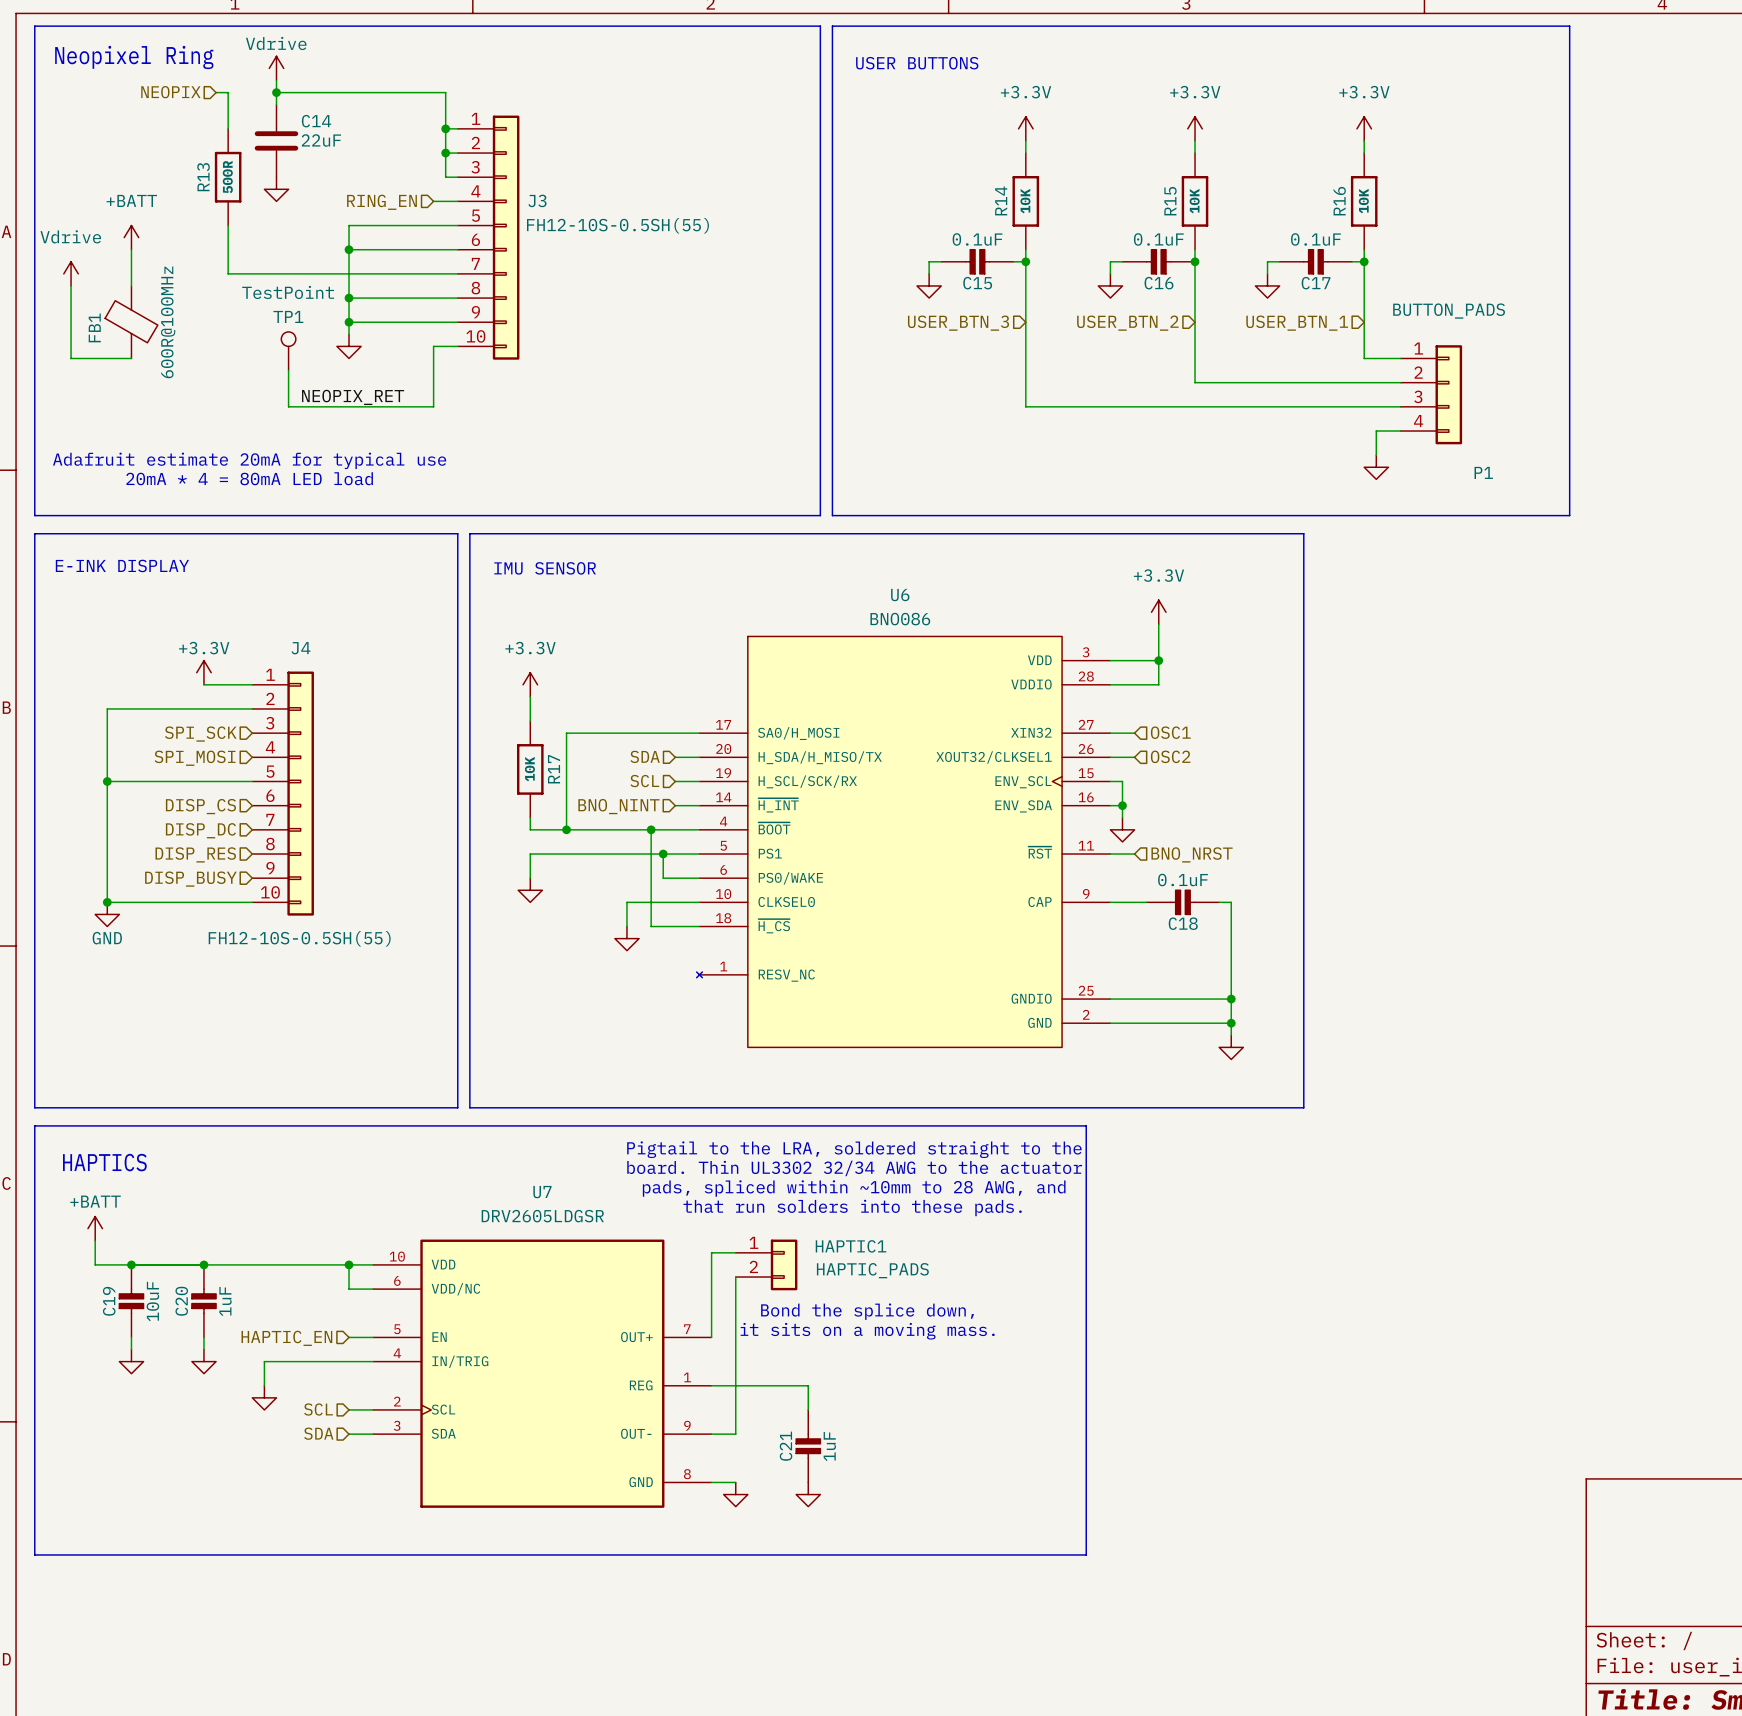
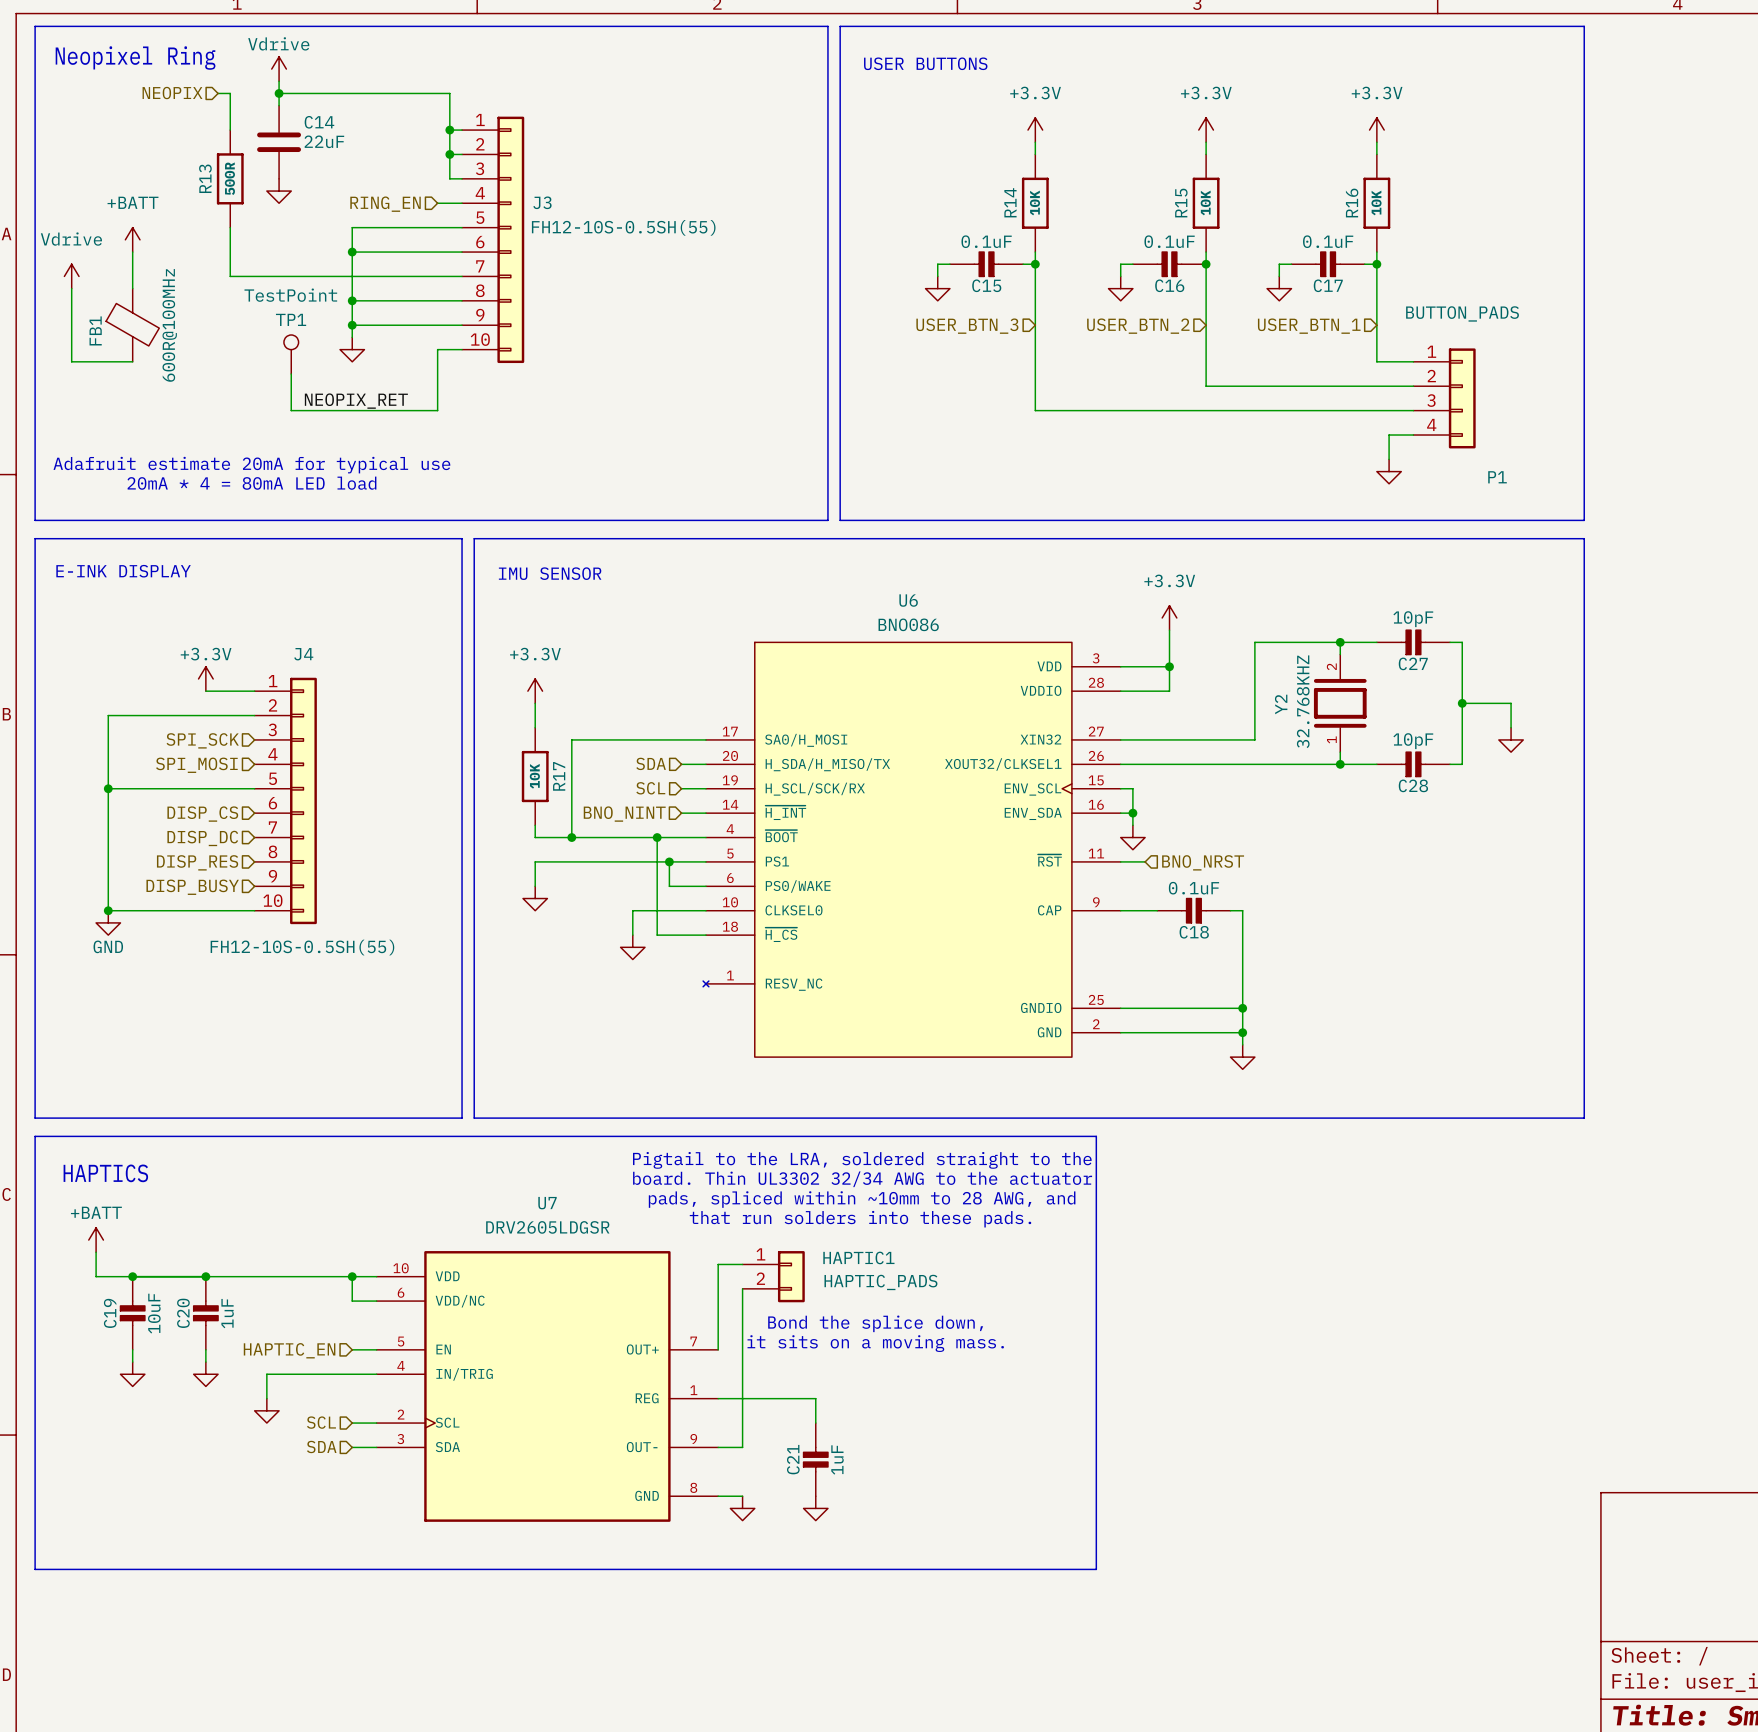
line: (1303, 533) (1303, 1107) -> (1315, 538) (1584, 538) (1584, 1118) (1315, 1118)
wire: none -> (1340, 642) (1340, 654)
junction: none -> (1340, 642)
wire: none -> (1376, 642) (1254, 642) (1254, 739) (1145, 739)
C27: none -> 10pF (1413, 642)
wire: none -> (1450, 642) (1462, 642) (1462, 764) (1450, 764)
Y2: none -> 32.768KHZ (1340, 703)
wire: none -> (1462, 703) (1511, 703) (1511, 727)
junction: none -> (1462, 703)
hierarchical label: OSC1 (1170, 732) -> none
power symbol: none -> (1511, 739)
wire: none -> (1340, 752) (1340, 764)
hierarchical label: OSC2 (1170, 756) -> none
wire: none -> (1145, 764) (1376, 764)
junction: none -> (1340, 764)
C28: none -> 10pF (1413, 764)

